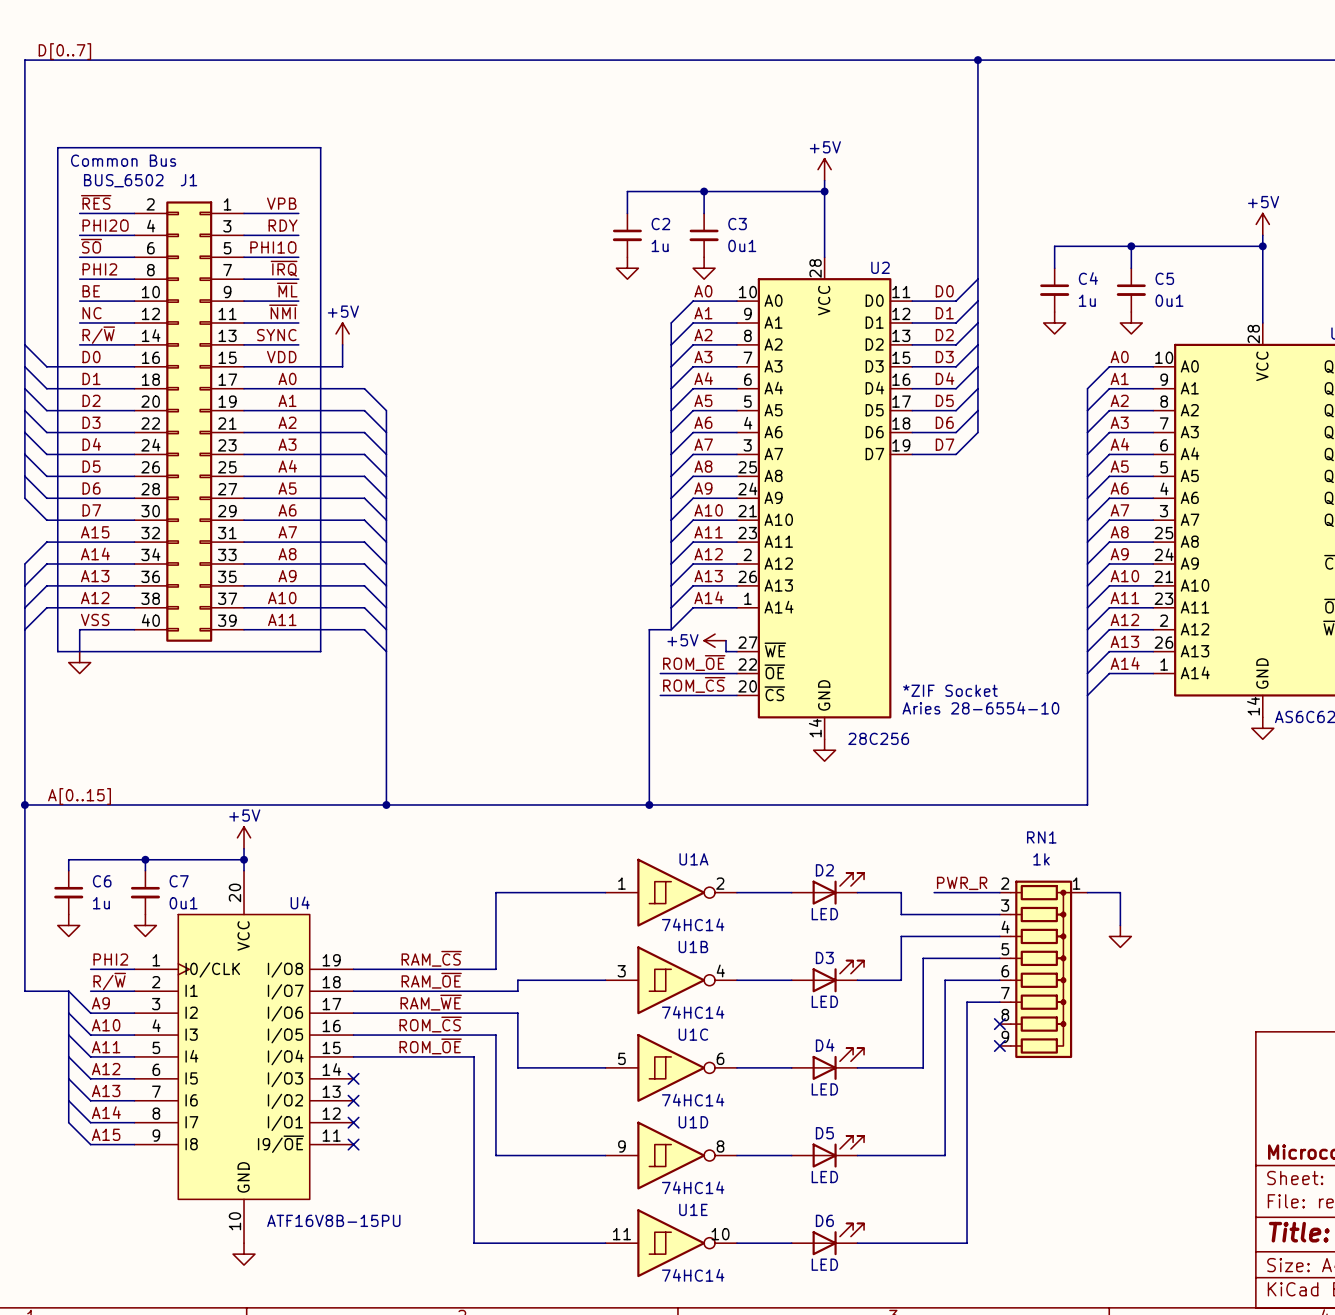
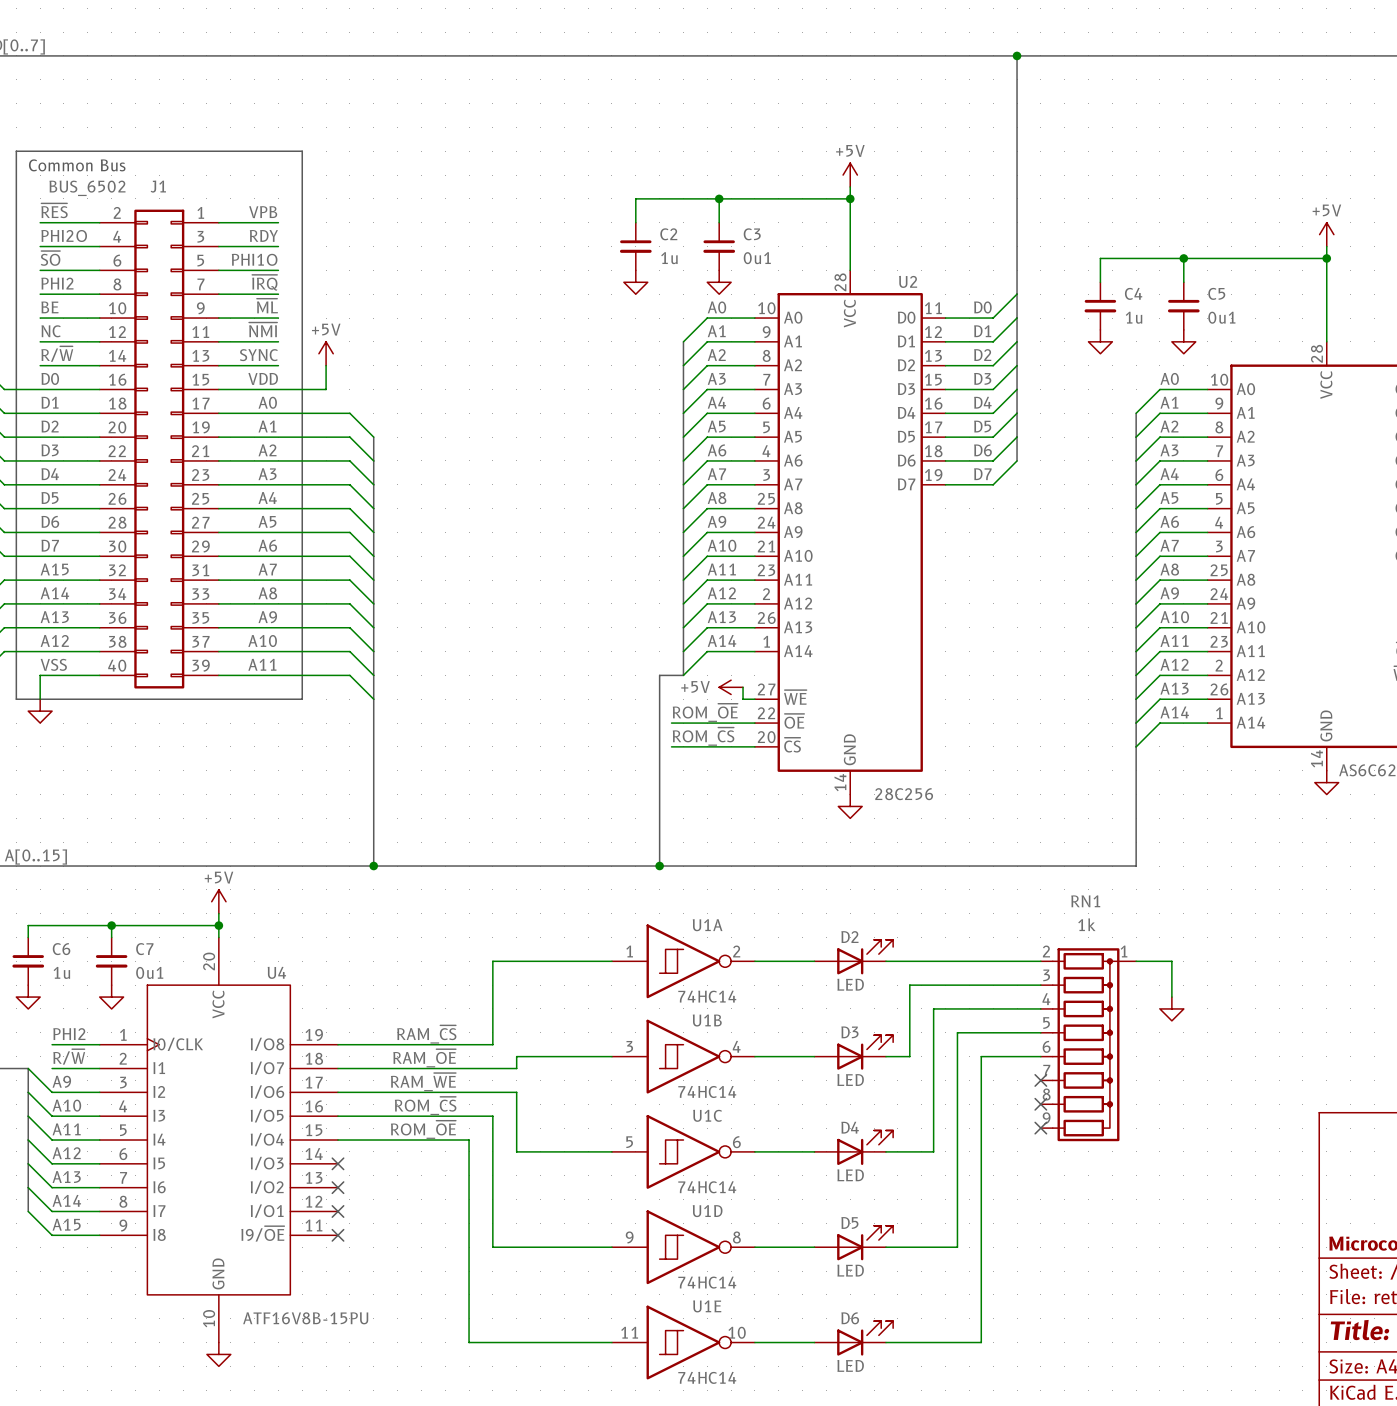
text: *ZIF Socket (950, 690) -> none
text: Aries 28-6554-10 (980, 708) -> none
label: PWR_R (962, 883) -> none
wire: (901, 892) (901, 914) -> (933, 961) (969, 961)
wire: (879, 980) (901, 980) -> (909, 1056) (909, 985) (933, 985)
wire: (999, 1002) (967, 1002) (967, 1243) (945, 1243) -> (981, 1247) (981, 1342)
no-connect mark: none -> (1040, 1080)
wire: (901, 1067) (923, 1067) -> (933, 1151) (933, 1056)
wire: (923, 1155) (945, 1155) -> (957, 1247) (957, 1151)

